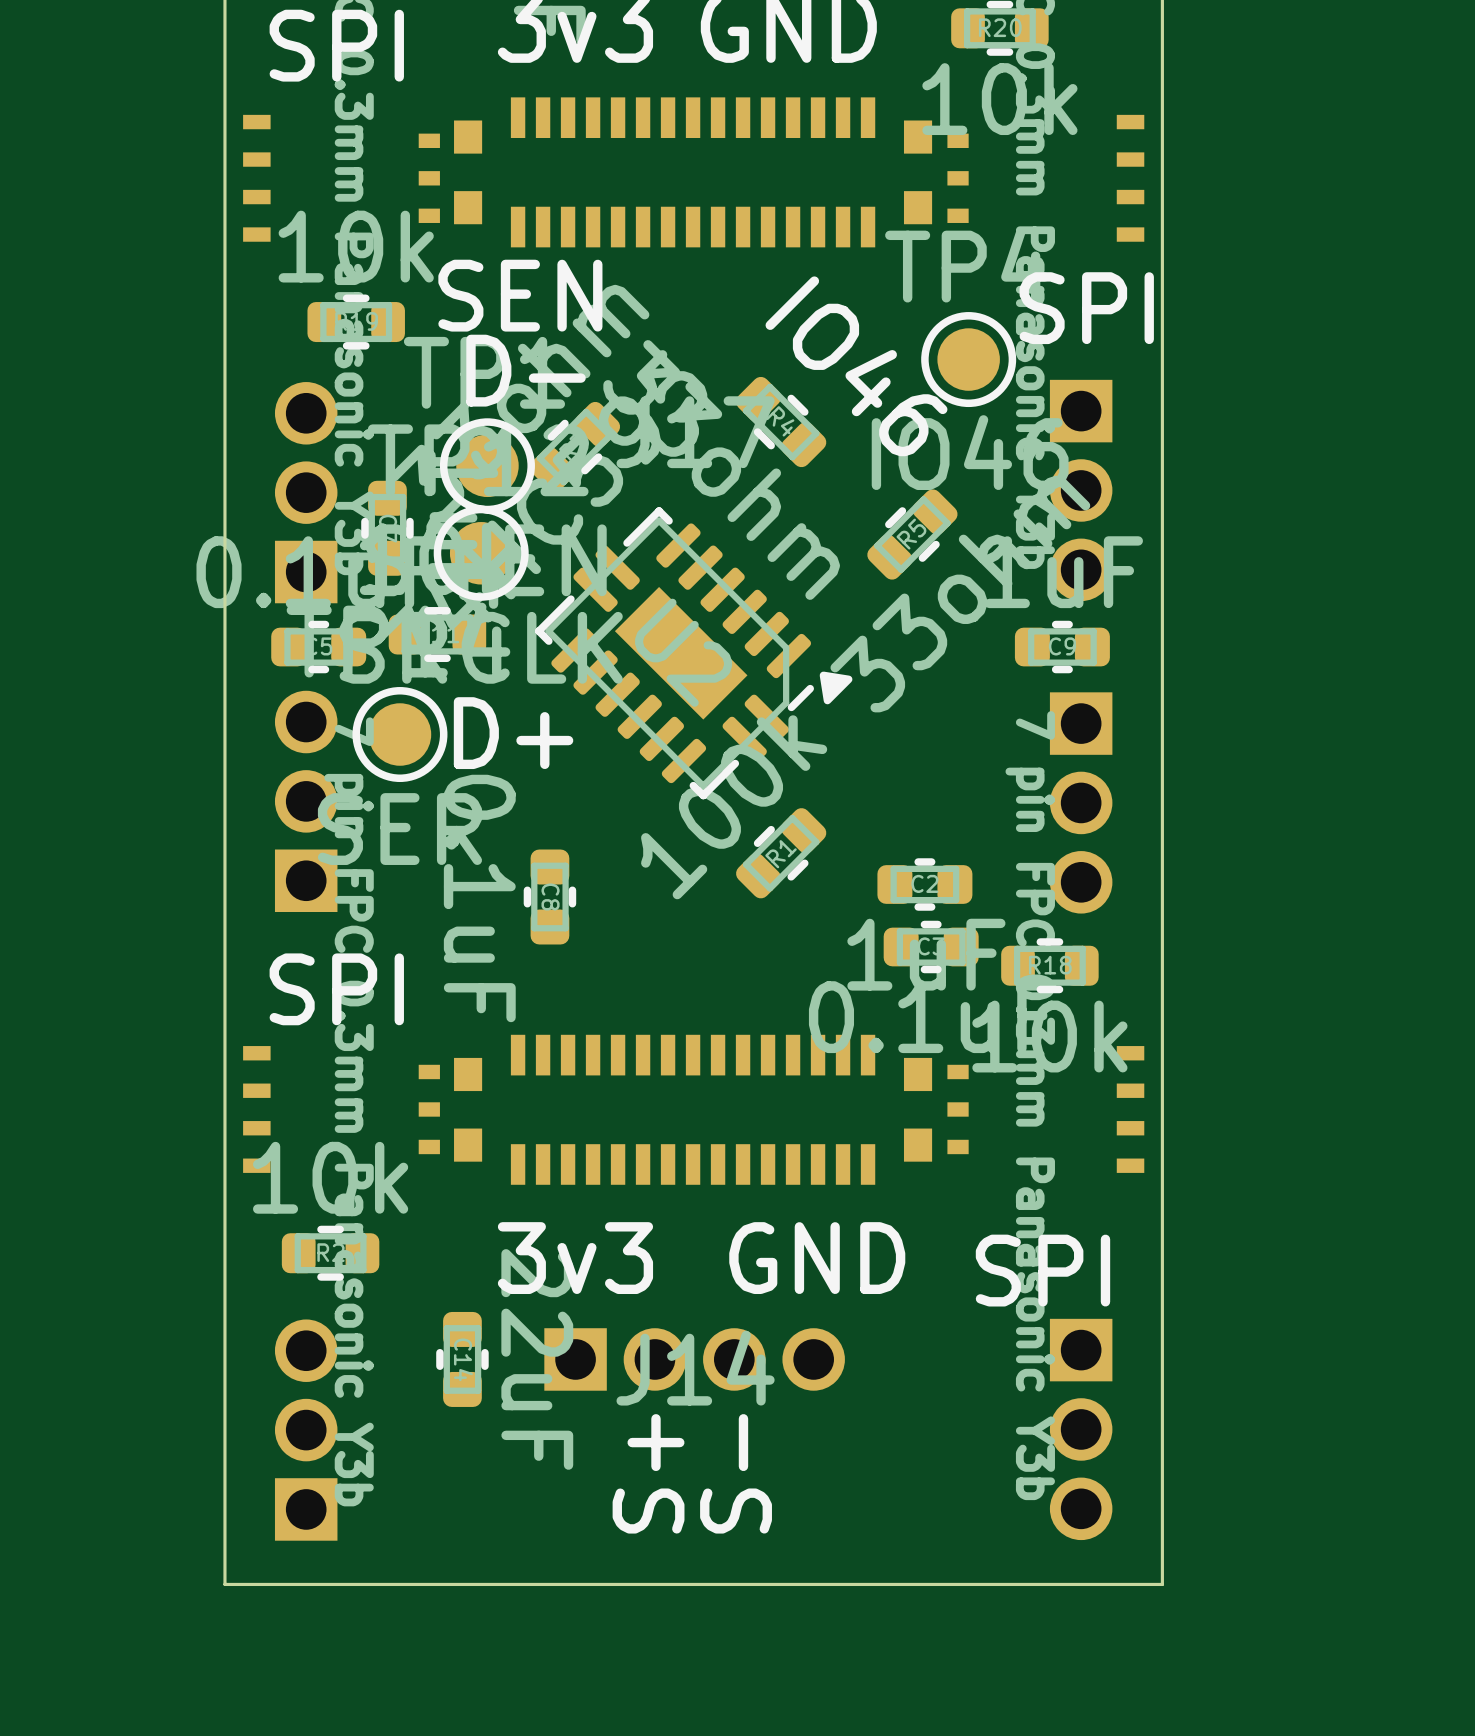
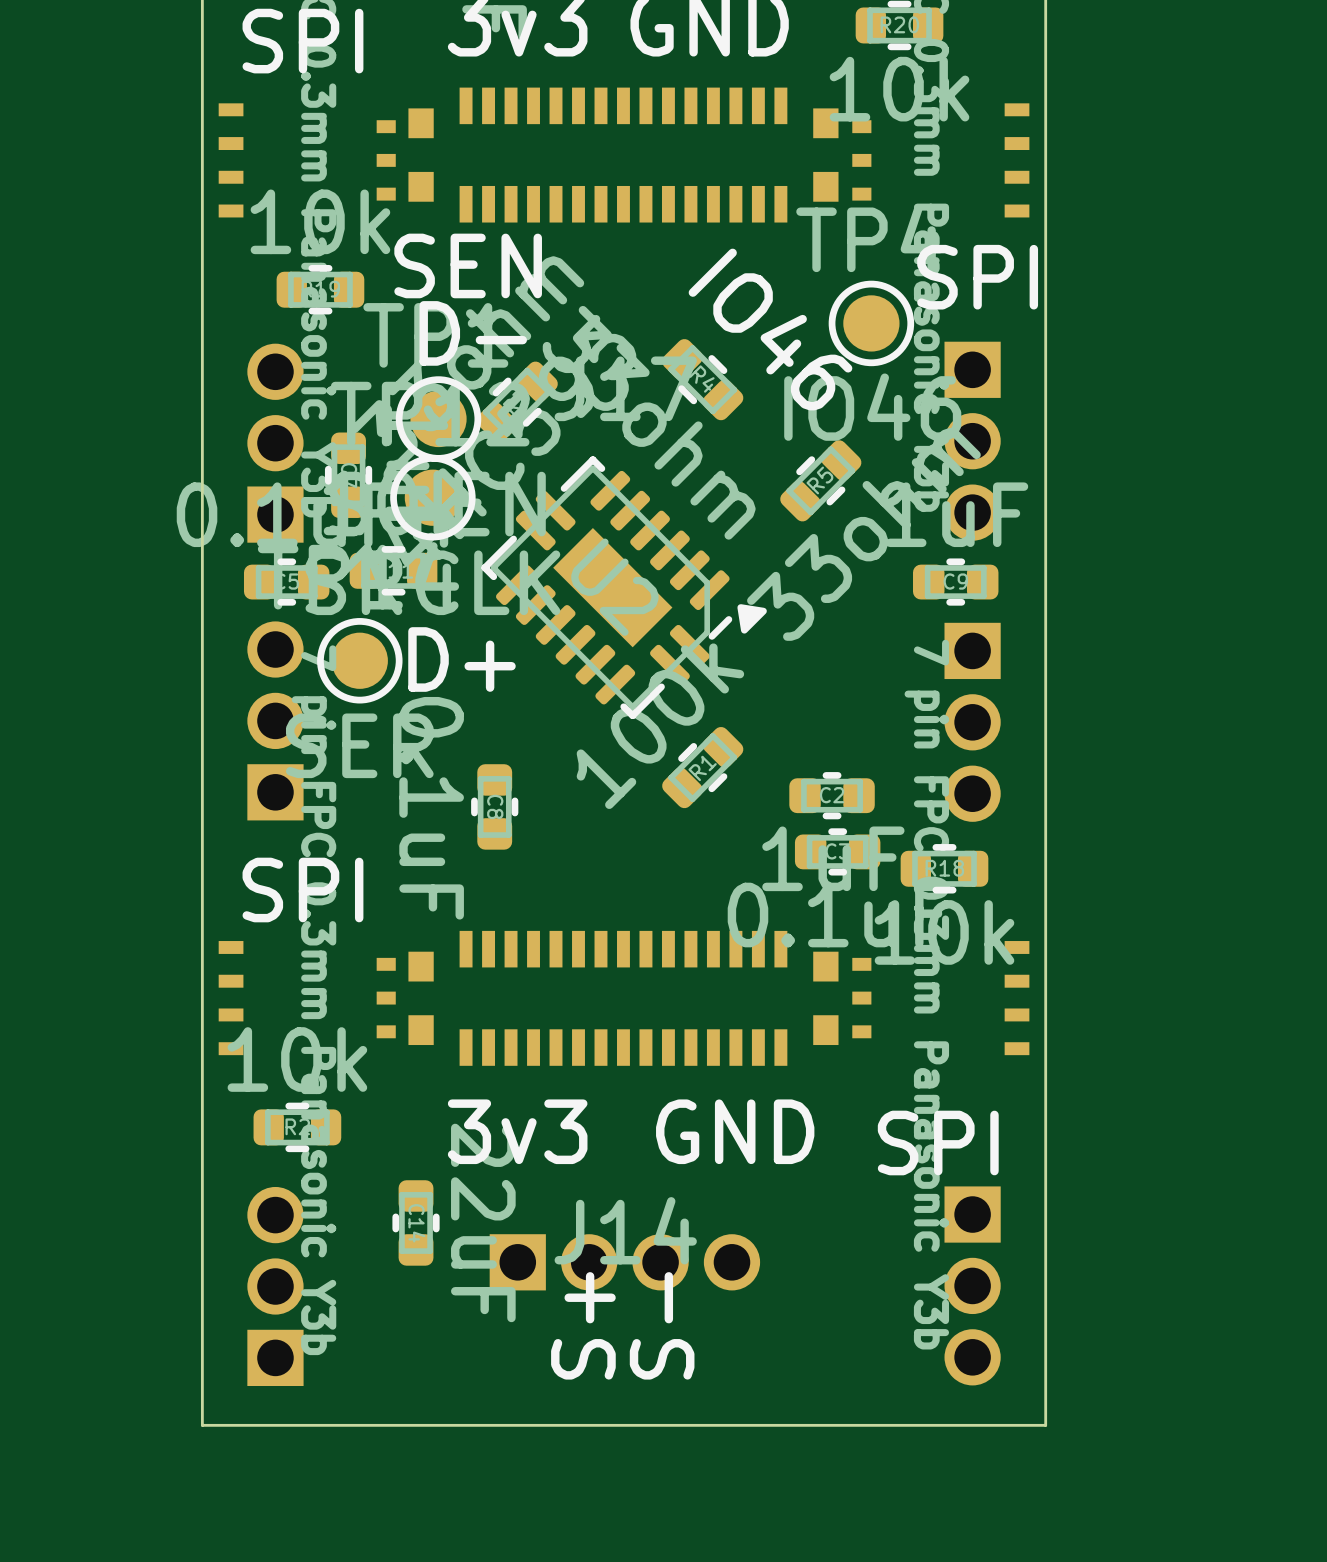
part position: (694, 1359) -> (624, 1262)

